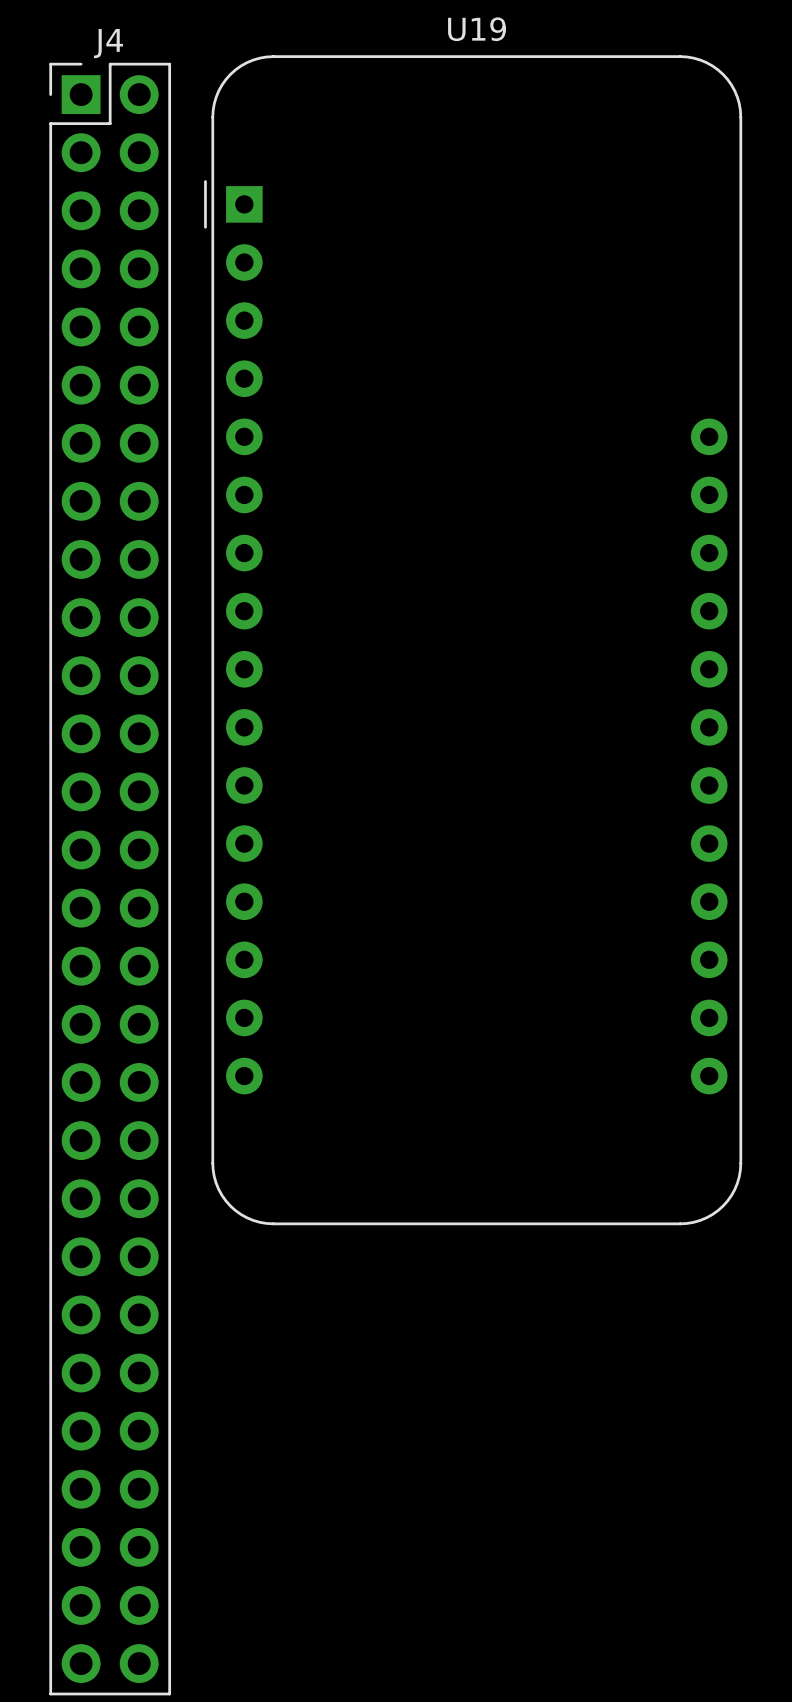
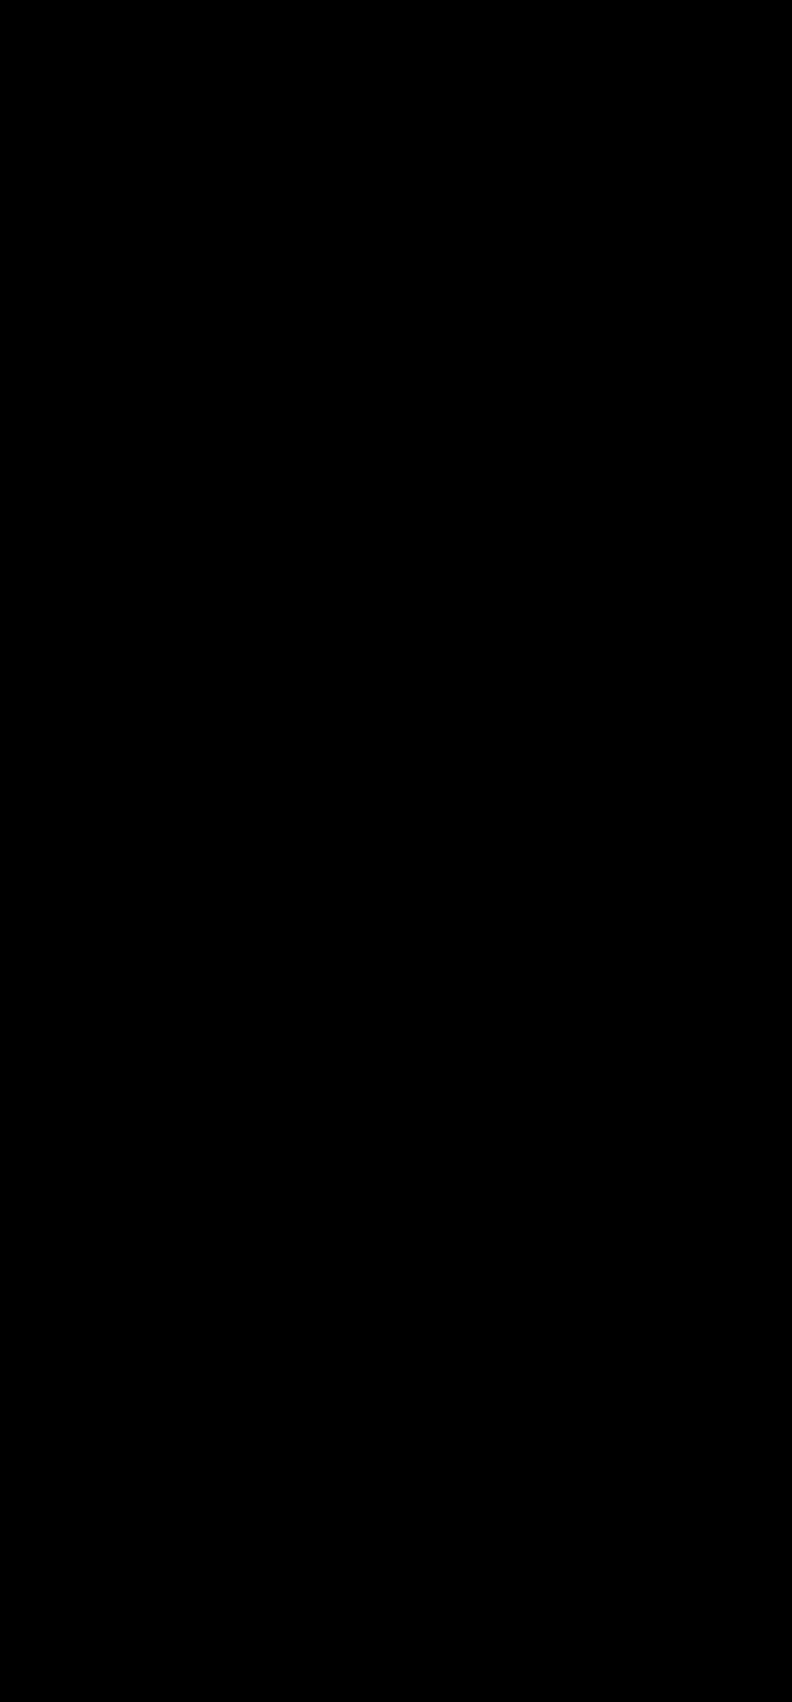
U19: (473, 640) -> none
J4: (110, 879) -> none

